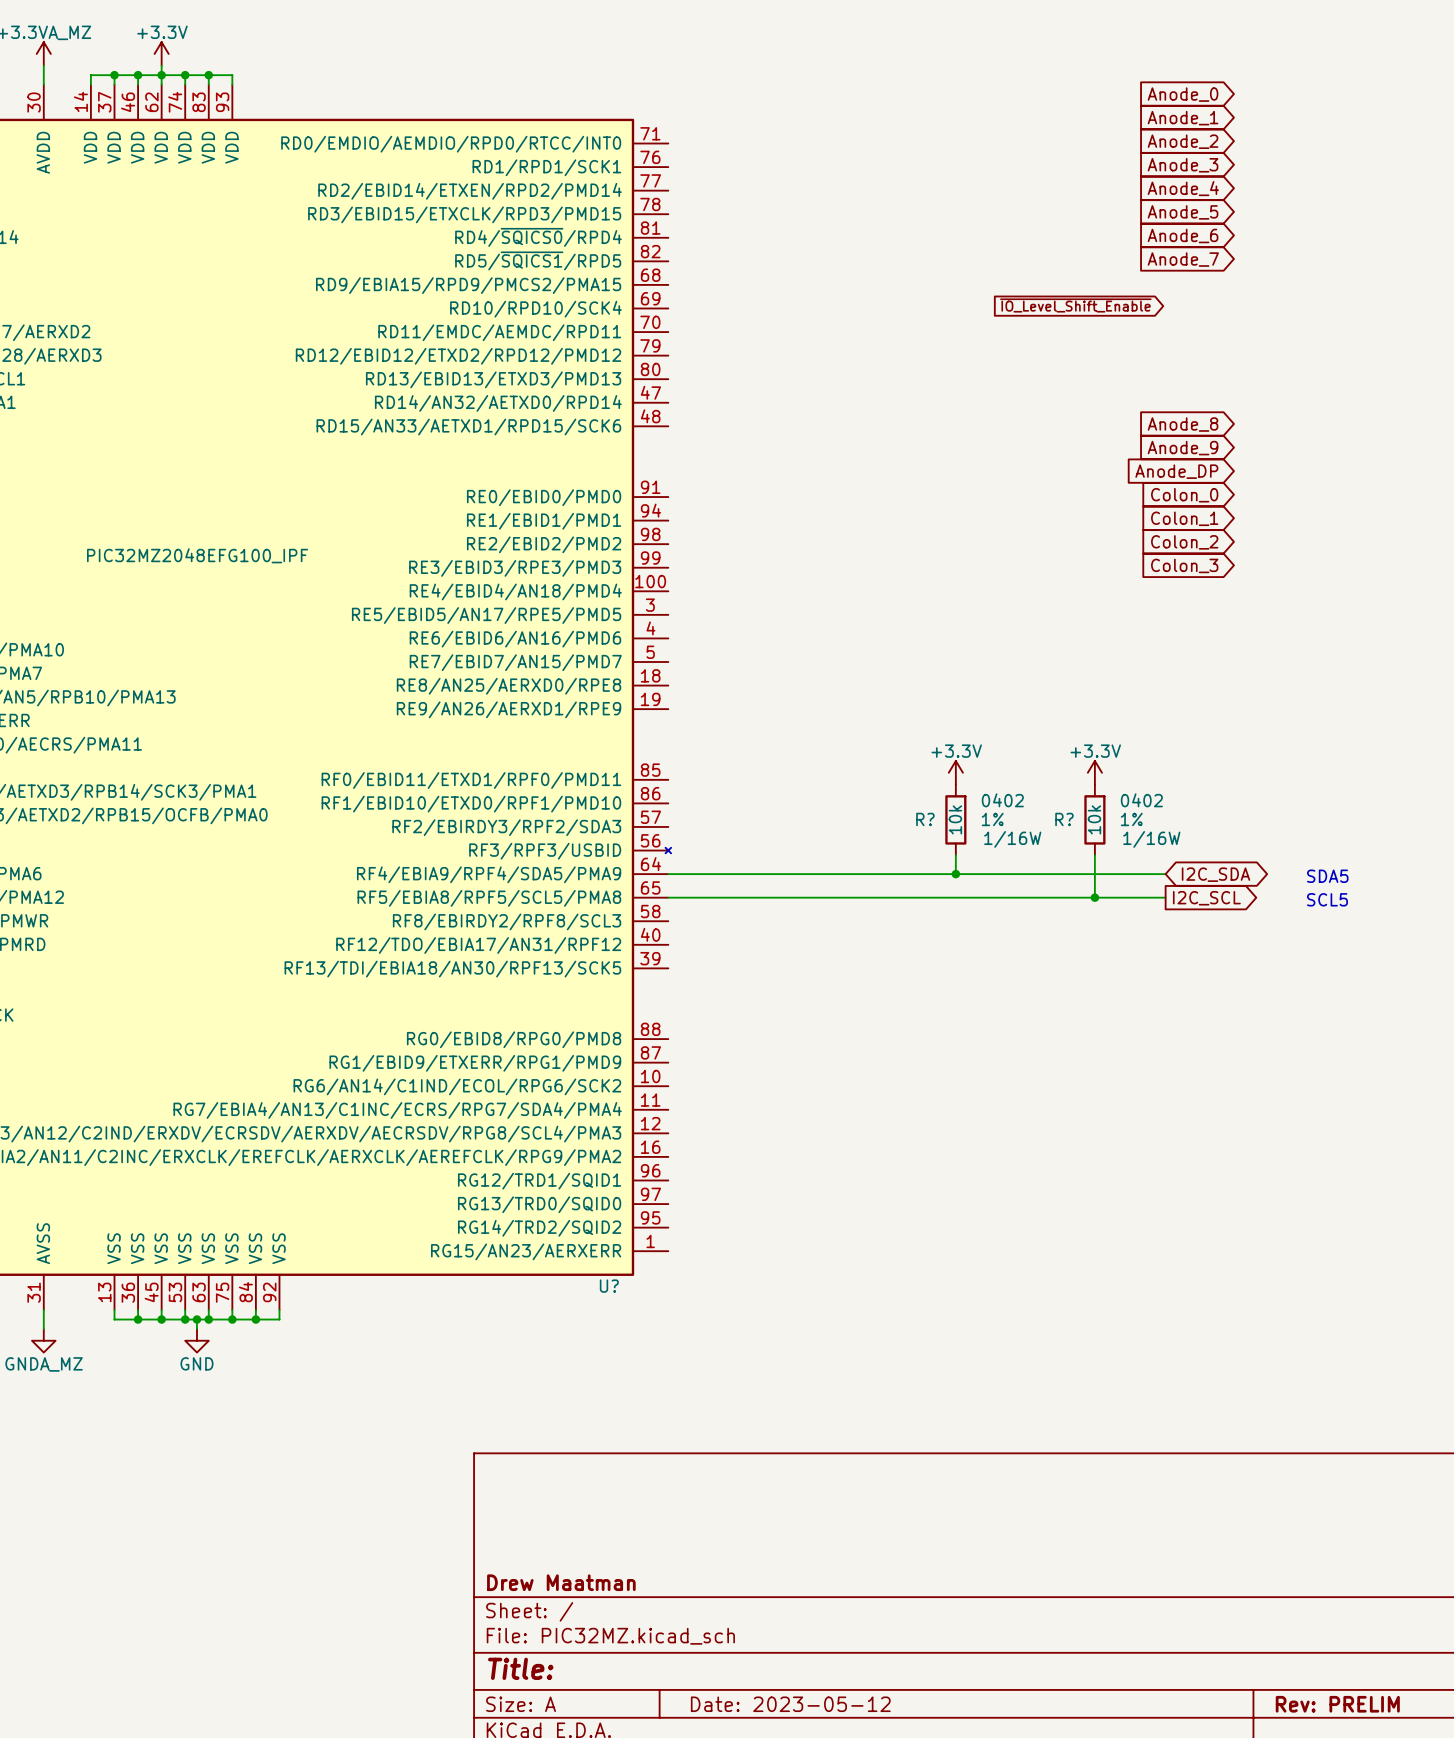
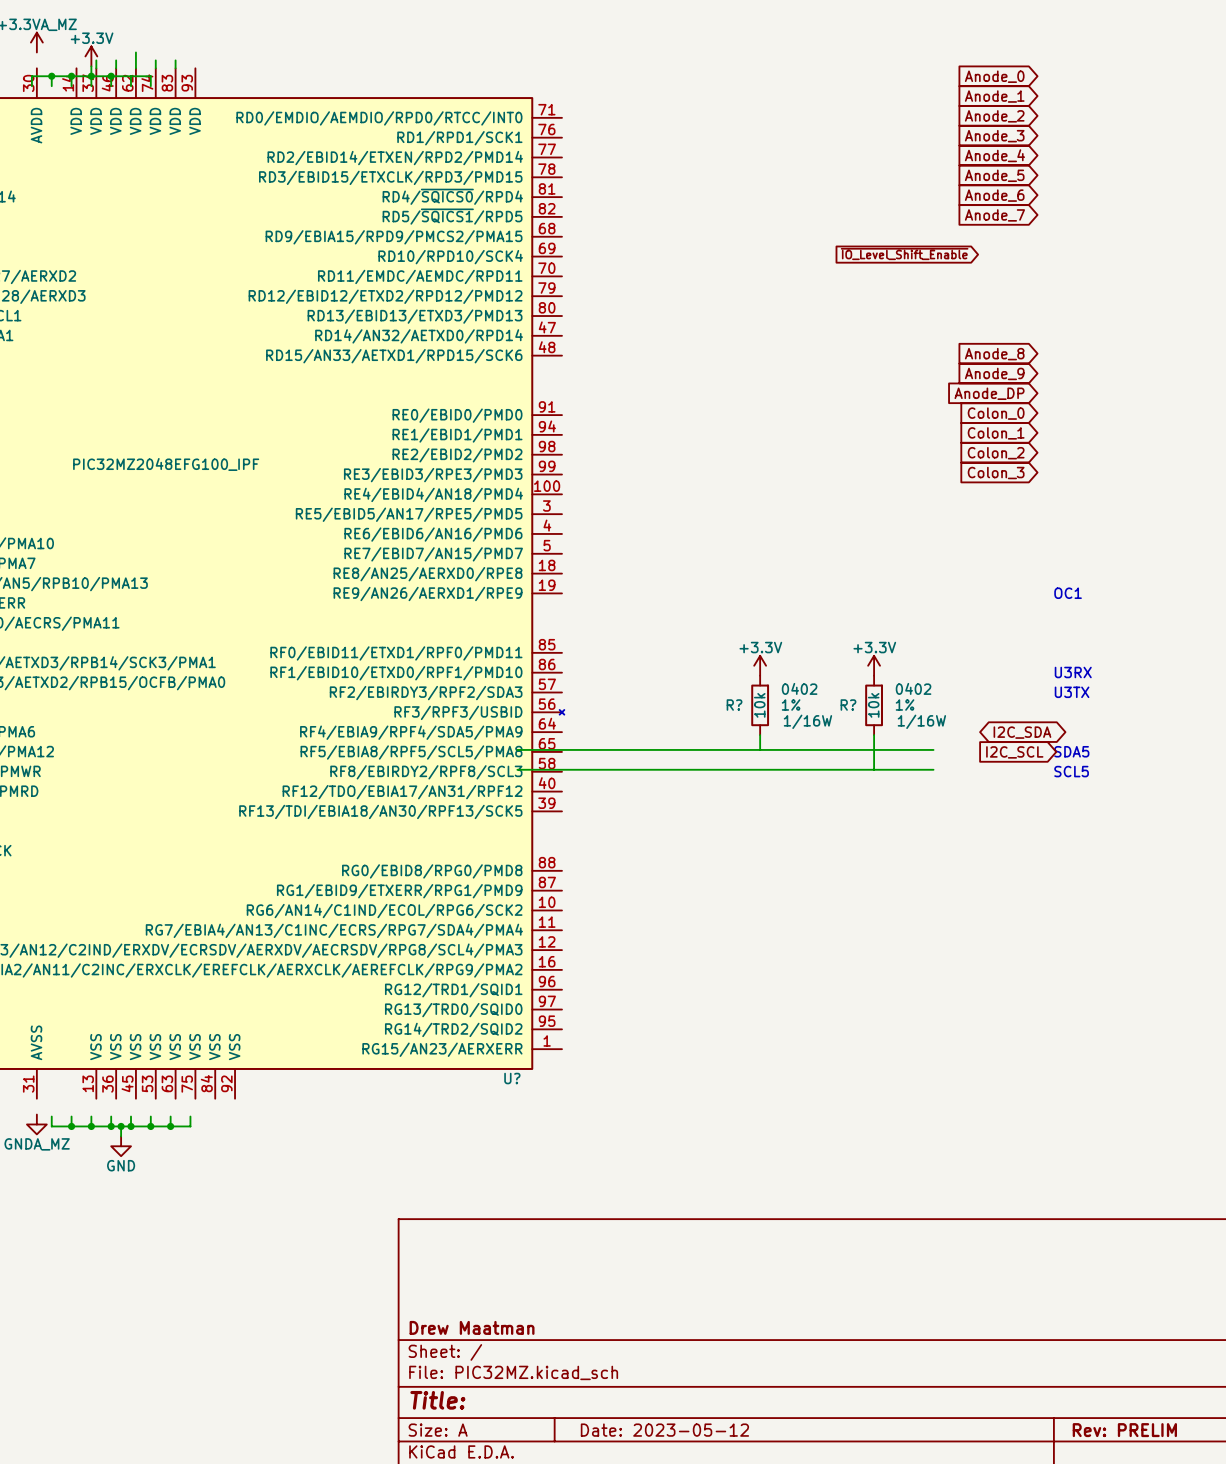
power symbol position: +3.3V (161, 53) -> +3.3V (91, 56)
wire: (43, 65) (43, 84) -> none
junction: (114, 75) -> none
junction: (138, 75) -> none
junction: (161, 75) -> none
junction: (185, 75) -> none
junction: (208, 75) -> none
wire: none -> (91, 66) (91, 86)
wire: (90, 84) (90, 75) (232, 75) (232, 84) -> none
wire: none -> (51, 76) (51, 86)
junction: none -> (51, 76)
wire: none -> (71, 76) (71, 86)
junction: none -> (71, 76)
junction: none -> (91, 76)
wire: none -> (111, 76) (111, 86)
junction: none -> (111, 76)
wire: none -> (131, 76) (131, 86)
wire: none -> (31, 86) (31, 76) (150, 76) (150, 86)
text: none -> OC1 (1068, 593)
power symbol: +3.3V (955, 772) -> none
power symbol: +3.3V (1094, 772) -> none
power symbol: none -> +3.3V (760, 665)
power symbol: none -> +3.3V (874, 665)
text: none -> U3RX (1073, 672)
R?: 10k (955, 819) -> none
R?: 10k (1094, 819) -> none
text: none -> U3TX (1072, 692)
R?: none -> 10k (760, 705)
R?: none -> 10k (874, 705)
wire: (955, 855) (955, 874) -> none
wire: (1094, 855) (1094, 897) -> none
wire: (668, 874) (1165, 874) -> none
junction: (955, 874) -> none
text position: SDA5 (1327, 876) -> SDA5 (1071, 751)
wire: none -> (760, 735) (760, 749)
wire: none -> (874, 735) (874, 769)
wire: none -> (517, 749) (933, 749)
wire: (668, 897) (1165, 897) -> none
junction: (1094, 897) -> none
text position: SCL5 (1327, 899) -> SCL5 (1071, 771)
wire: none -> (517, 769) (933, 769)
wire: (43, 1310) (43, 1328) -> none
wire: (114, 1310) (114, 1319) (279, 1319) (279, 1310) -> none
wire: (138, 1310) (138, 1319) -> none
wire: (161, 1310) (161, 1319) -> none
wire: (185, 1310) (185, 1319) -> none
wire: (208, 1310) (208, 1319) -> none
wire: (232, 1310) (232, 1319) -> none
wire: (255, 1310) (255, 1319) -> none
junction: (138, 1319) -> none
junction: (161, 1319) -> none
junction: (185, 1319) -> none
wire: (196, 1319) (196, 1328) -> none
junction: (196, 1319) -> none
junction: (208, 1319) -> none
junction: (232, 1319) -> none
junction: (255, 1319) -> none
wire: none -> (51, 1116) (51, 1126) (190, 1126) (190, 1116)
wire: none -> (71, 1116) (71, 1126)
wire: none -> (91, 1116) (91, 1126)
wire: none -> (111, 1116) (111, 1126)
wire: none -> (131, 1116) (131, 1126)
wire: none -> (150, 1116) (150, 1126)
wire: none -> (170, 1116) (170, 1126)
power symbol position: GND (196, 1340) -> GND (121, 1146)
junction: none -> (71, 1126)
junction: none -> (91, 1126)
junction: none -> (111, 1126)
wire: none -> (121, 1126) (121, 1136)
junction: none -> (121, 1126)
junction: none -> (131, 1126)
junction: none -> (150, 1126)
junction: none -> (170, 1126)

